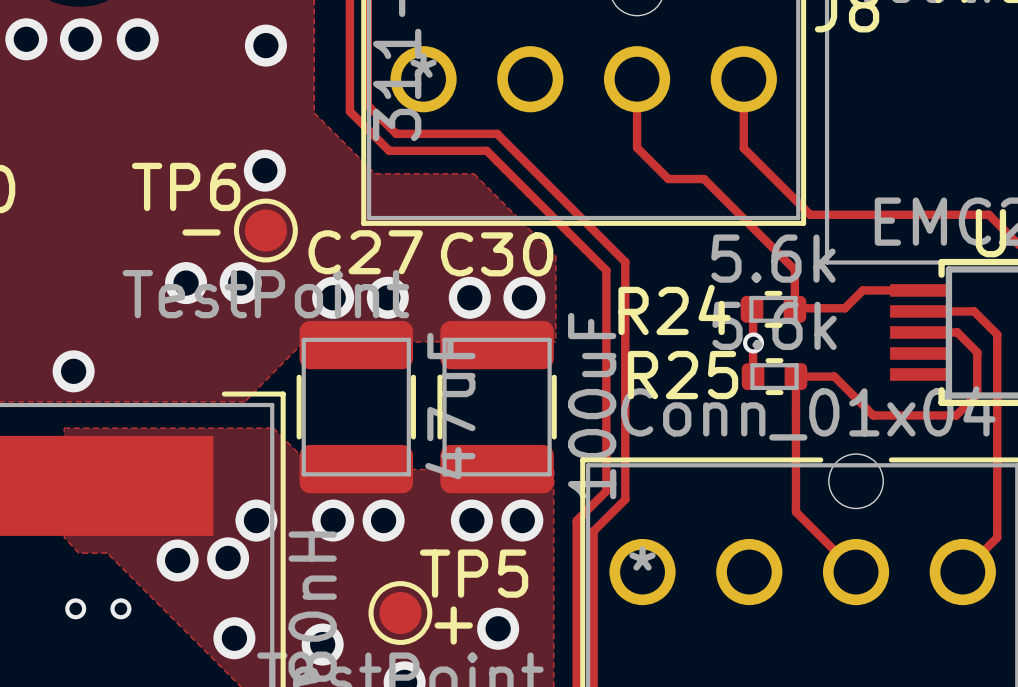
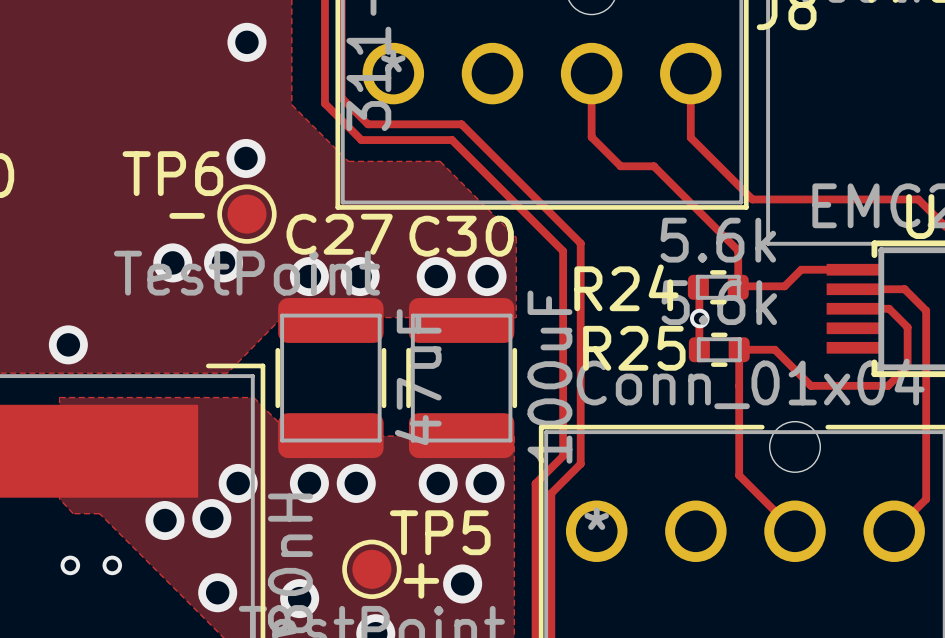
via: (26, 39) -> none
via: (80, 39) -> none
via: (137, 39) -> none

